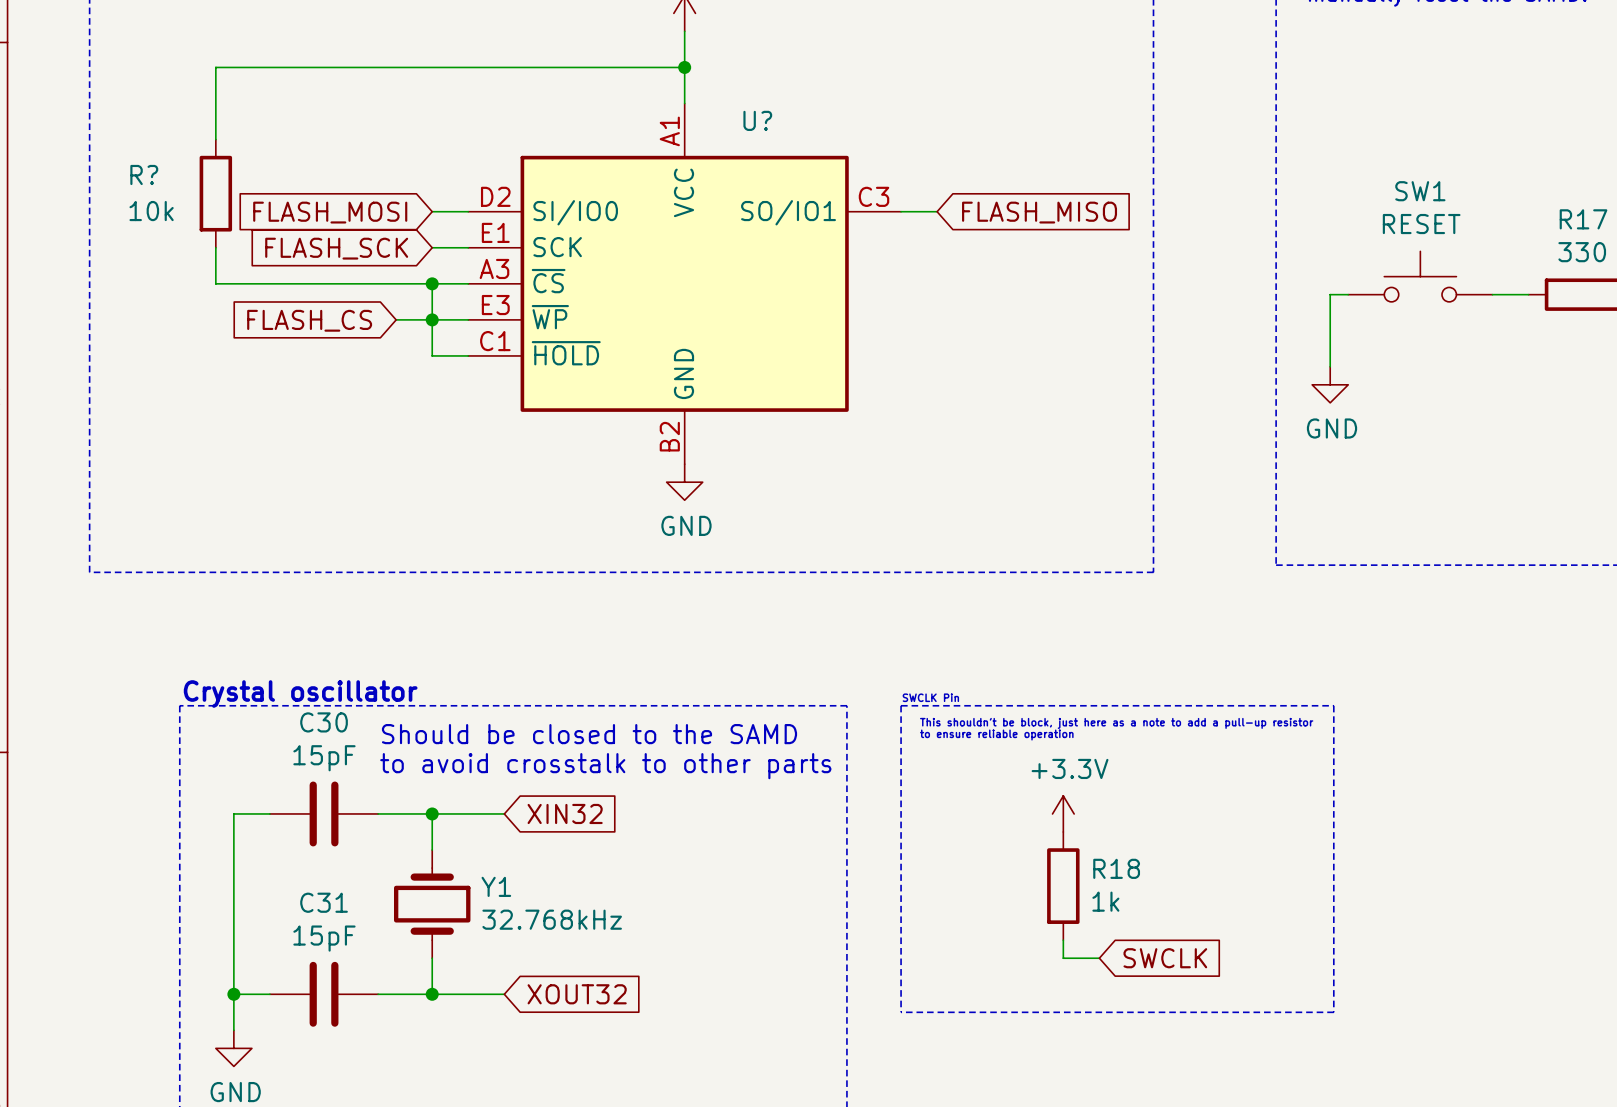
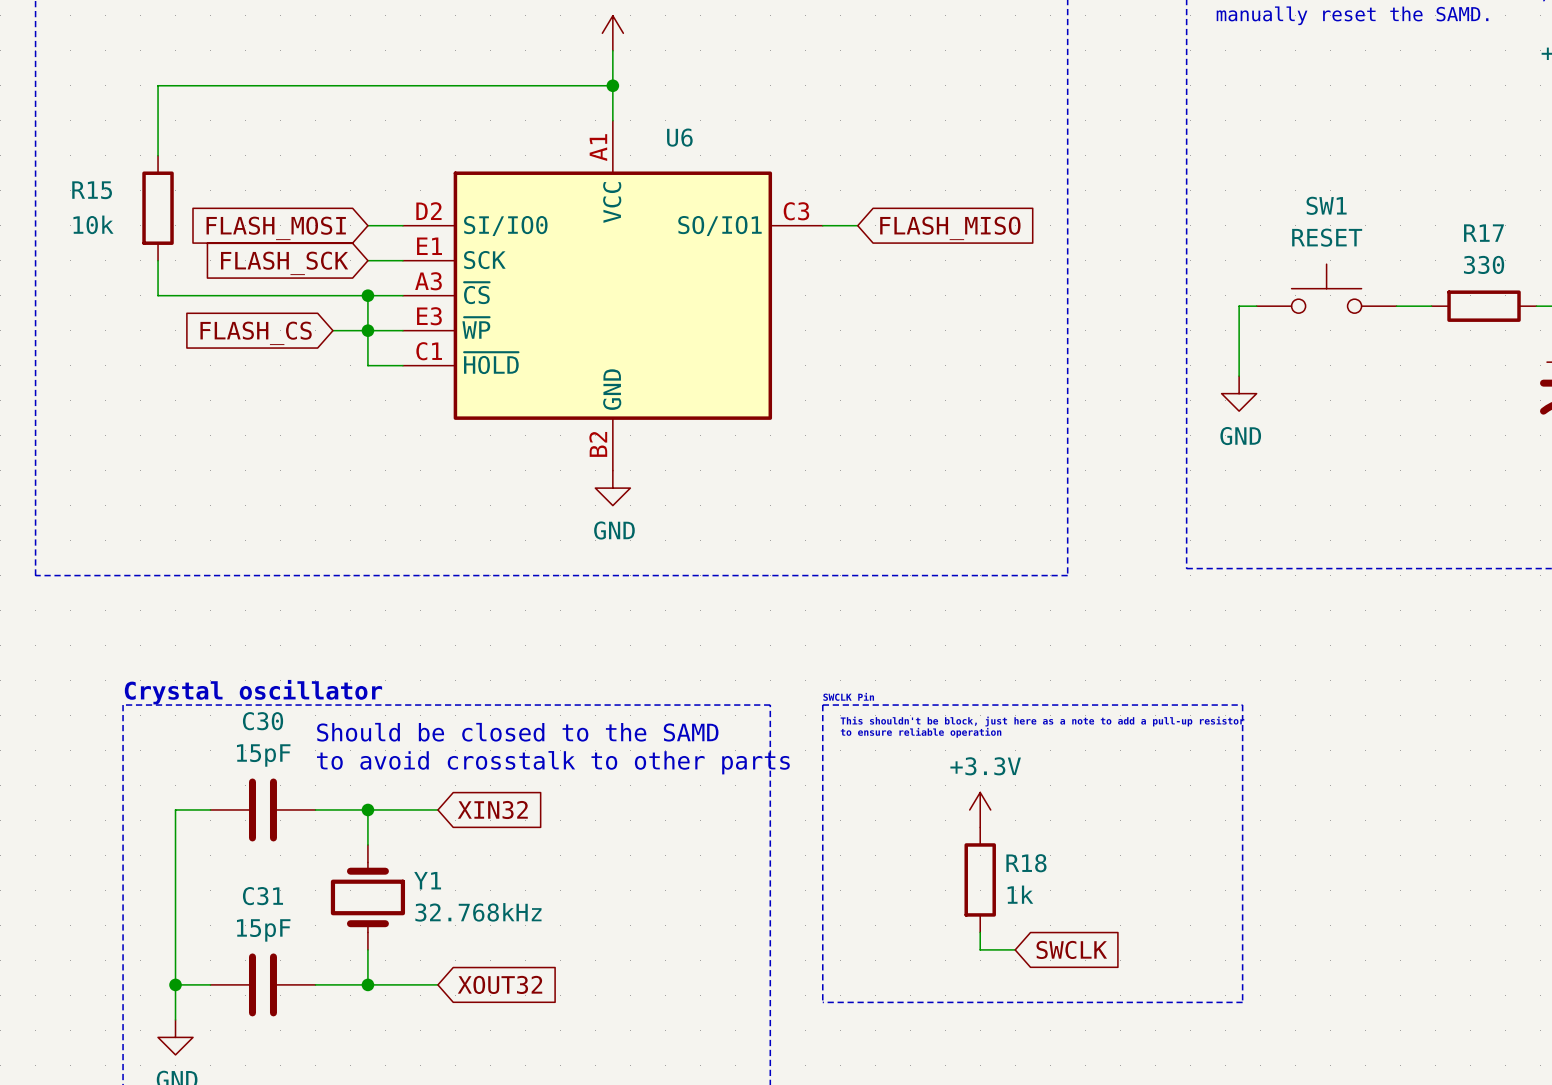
U? name: U? (757, 120) -> U6 (679, 137)
R? name: R? (144, 174) -> R15 (92, 190)

